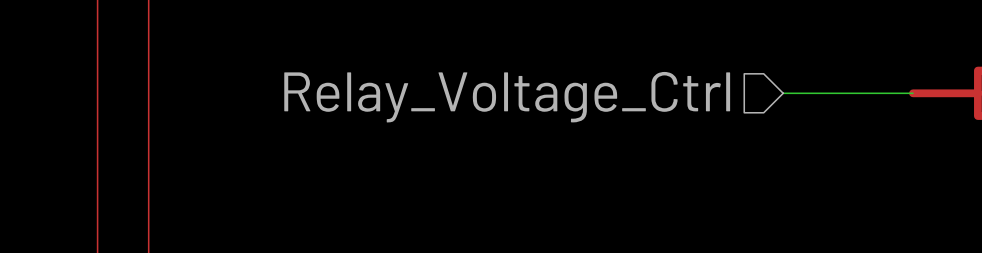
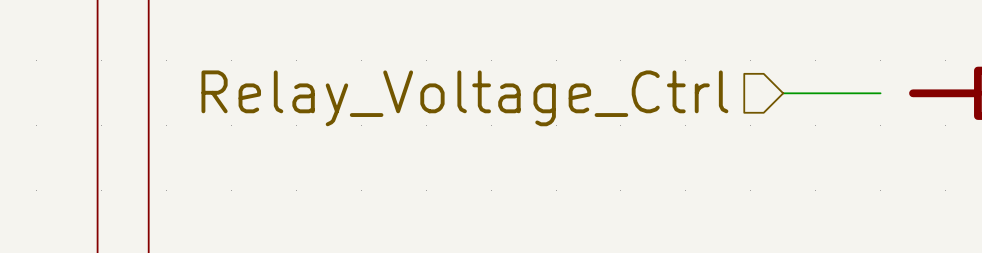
wire: (880, 93) (913, 93) -> none

